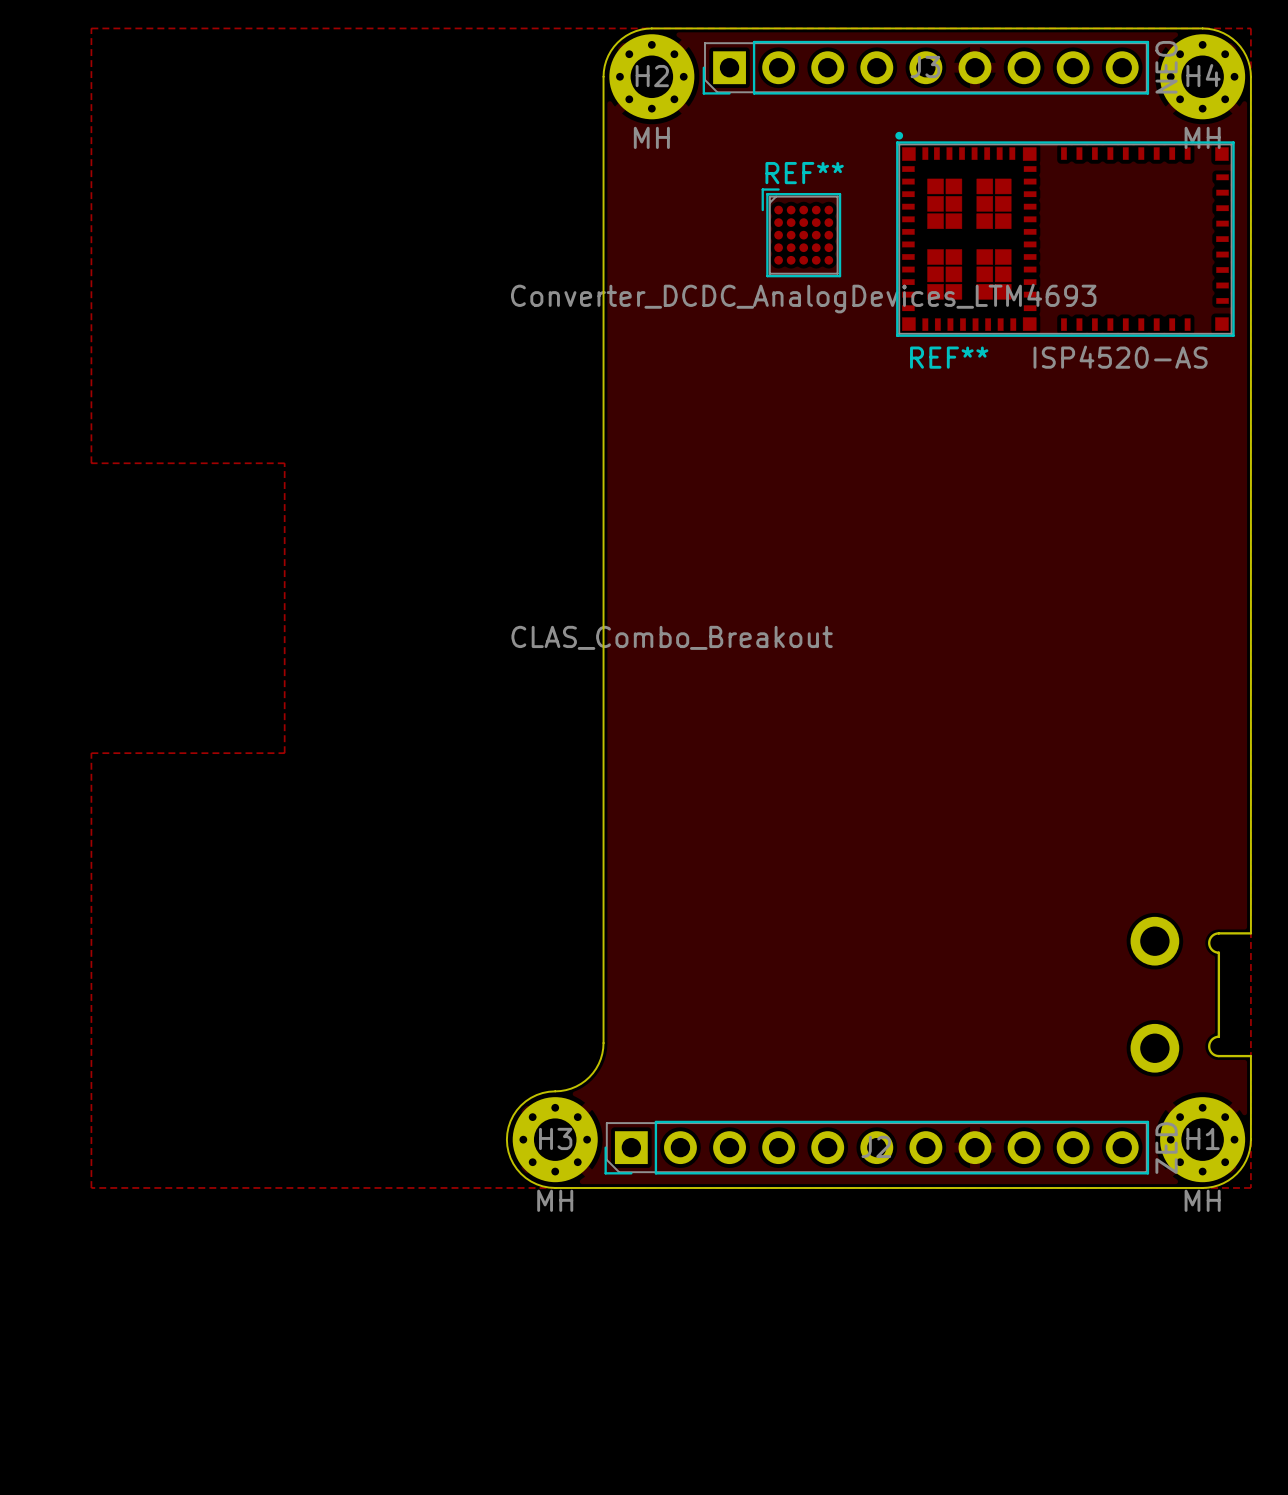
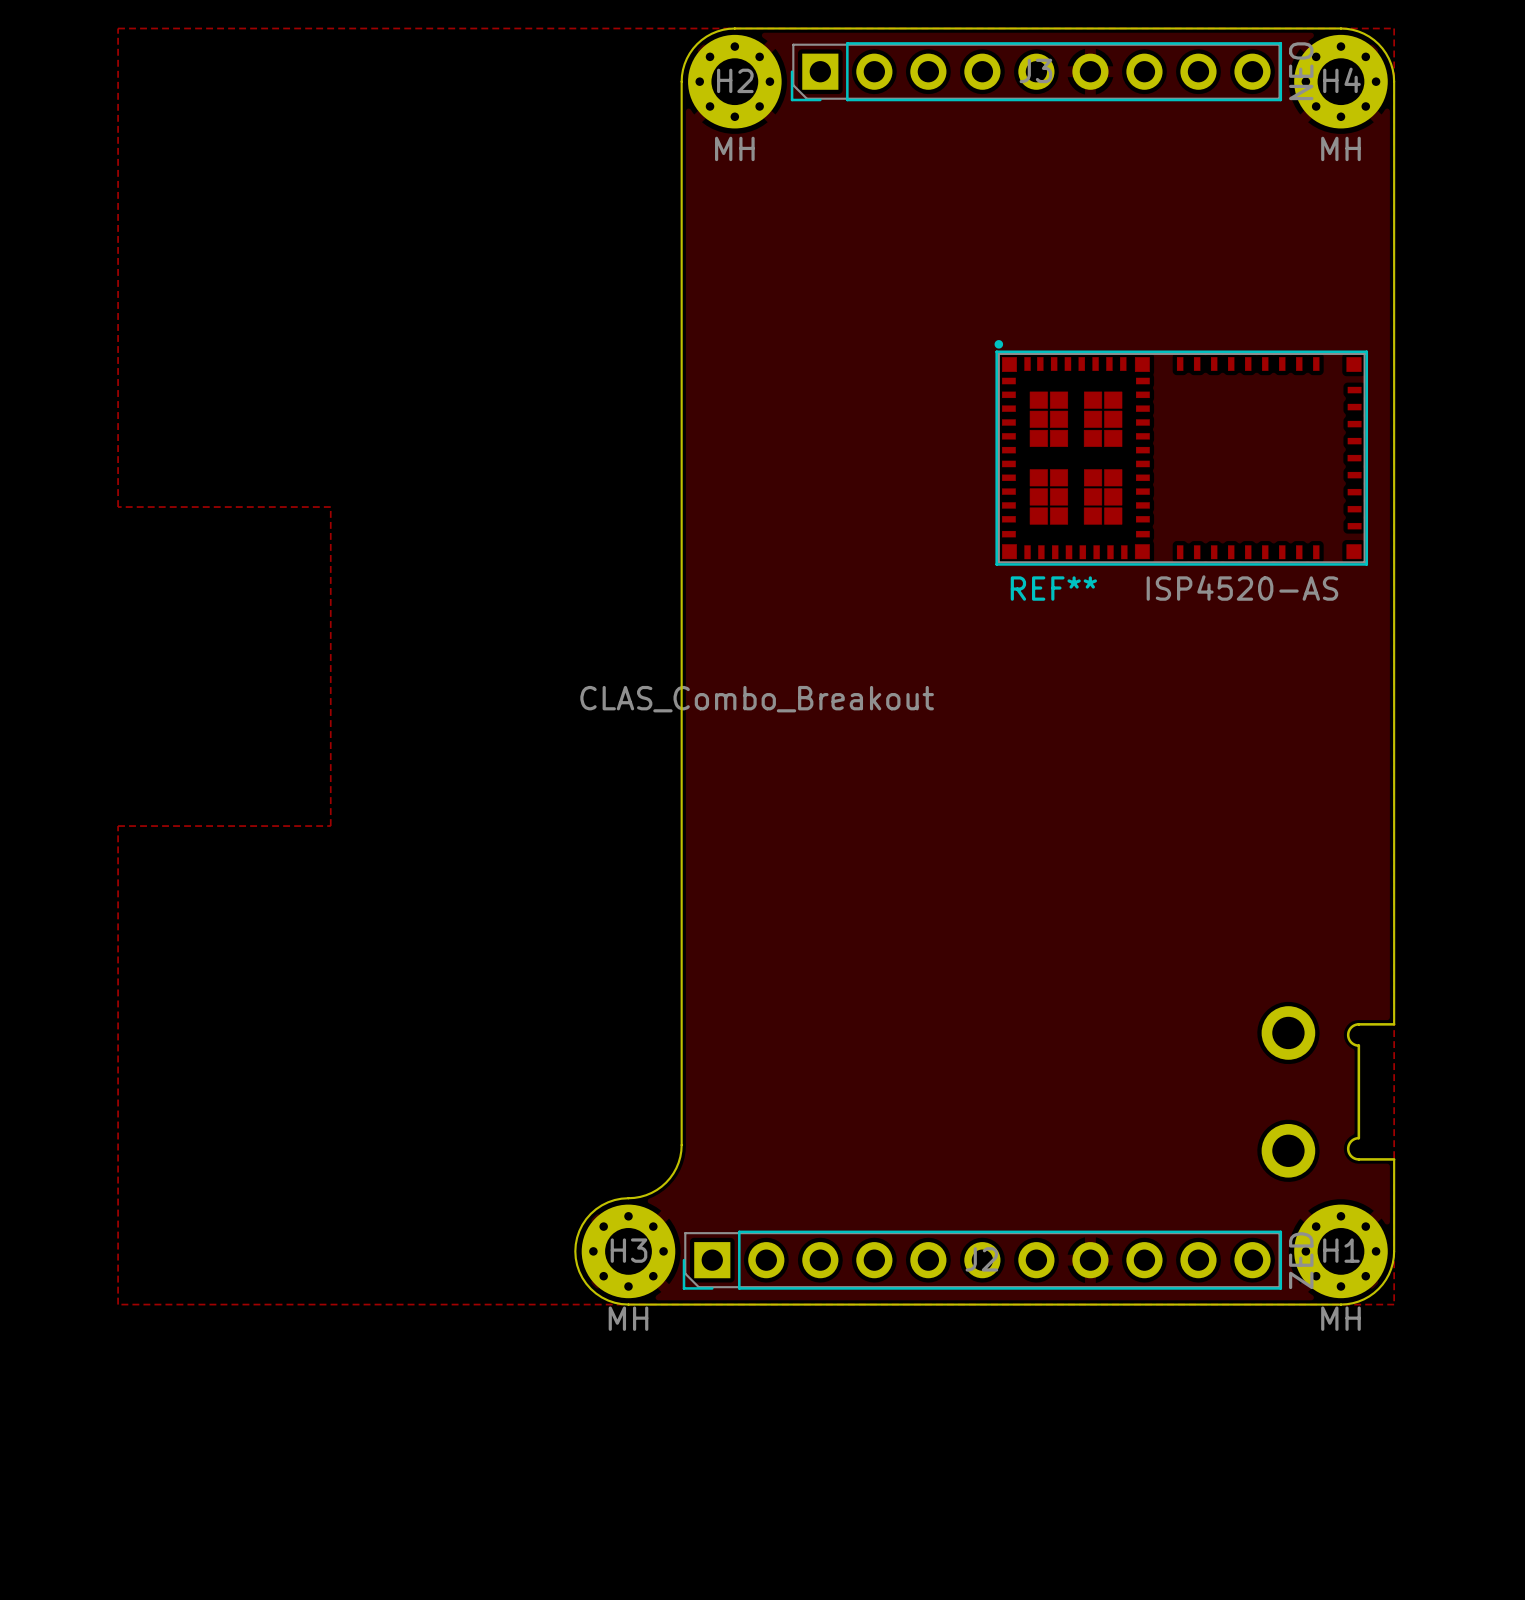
REF**: Converter_DCDC_AnalogDevices_LTM4693 (801, 232) -> none
REF** position: (1065, 234) -> (1181, 452)

